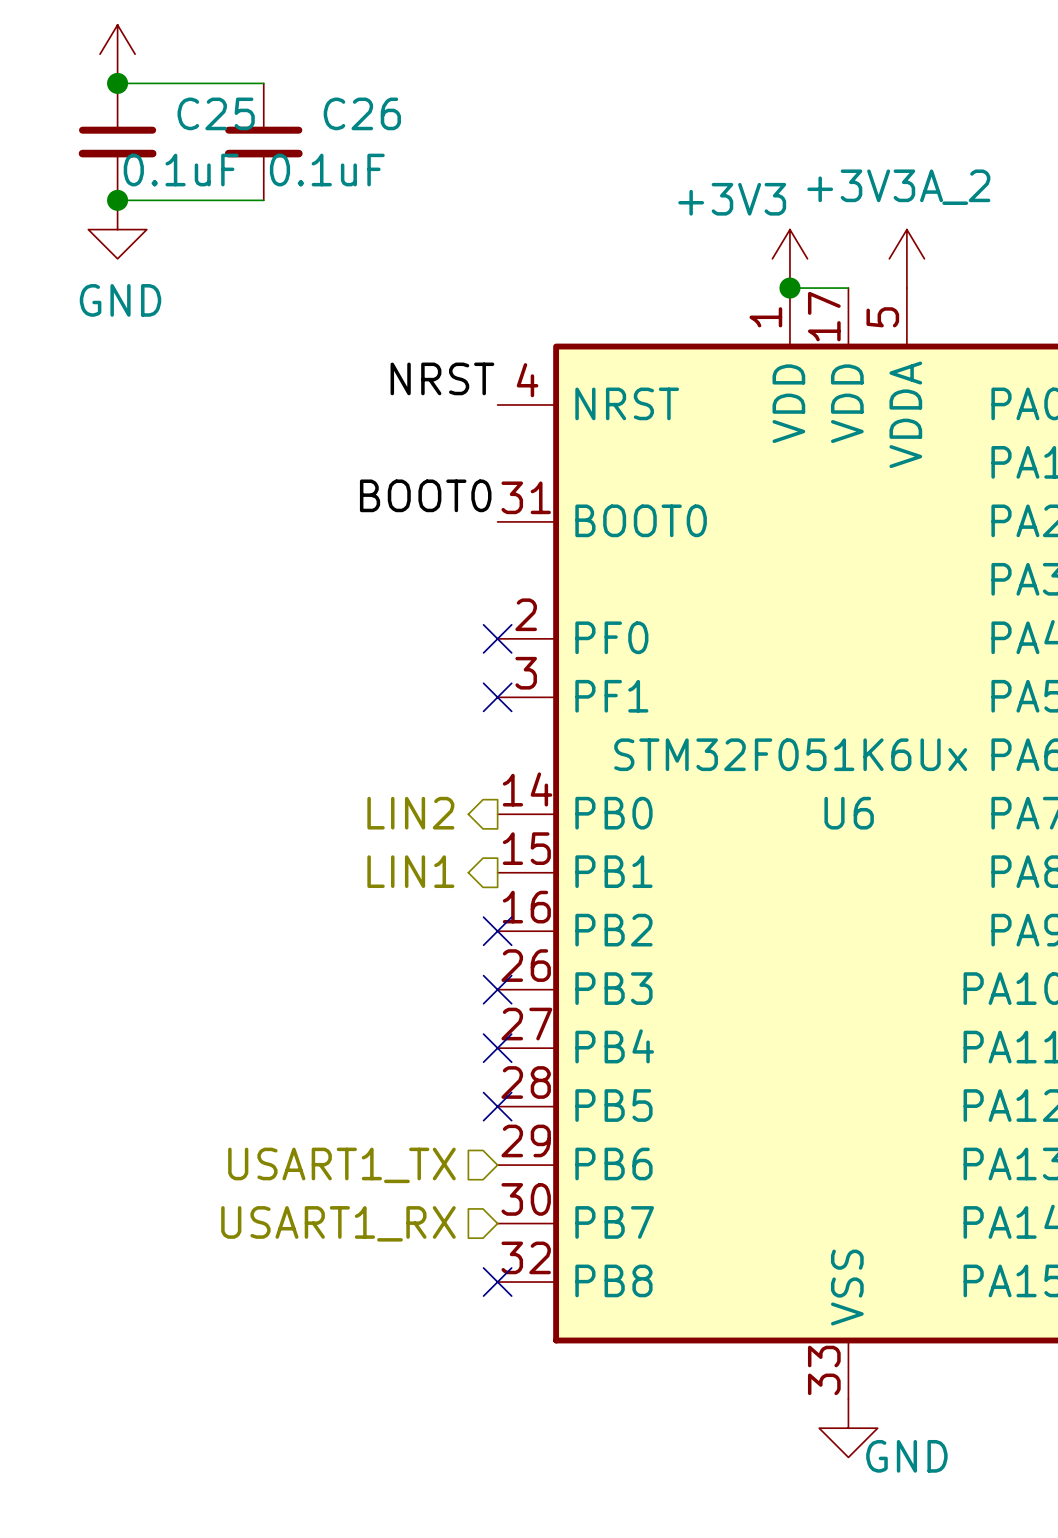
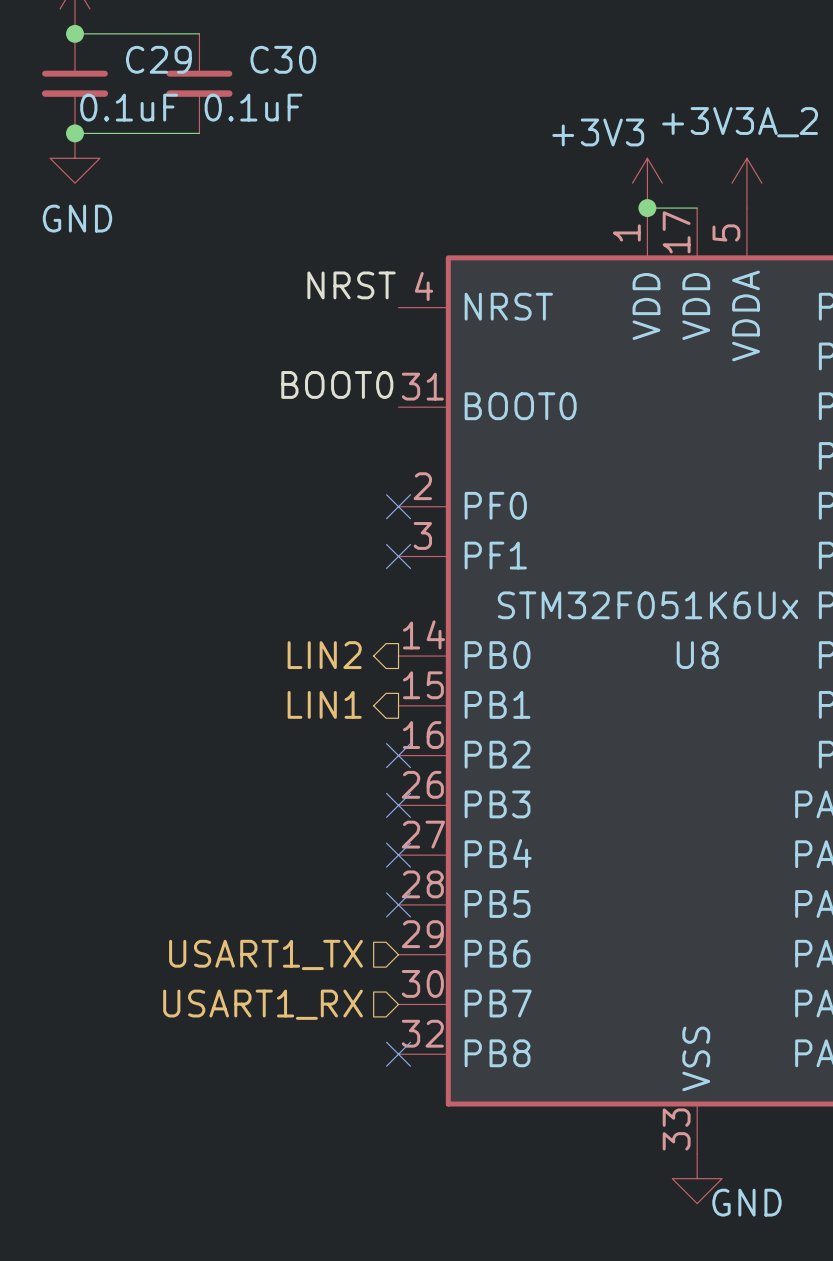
C25 name: C25 (216, 113) -> C29 (158, 59)
C26 name: C26 (362, 113) -> C30 (283, 59)
U6 name: U6 (849, 813) -> U8 (697, 655)

